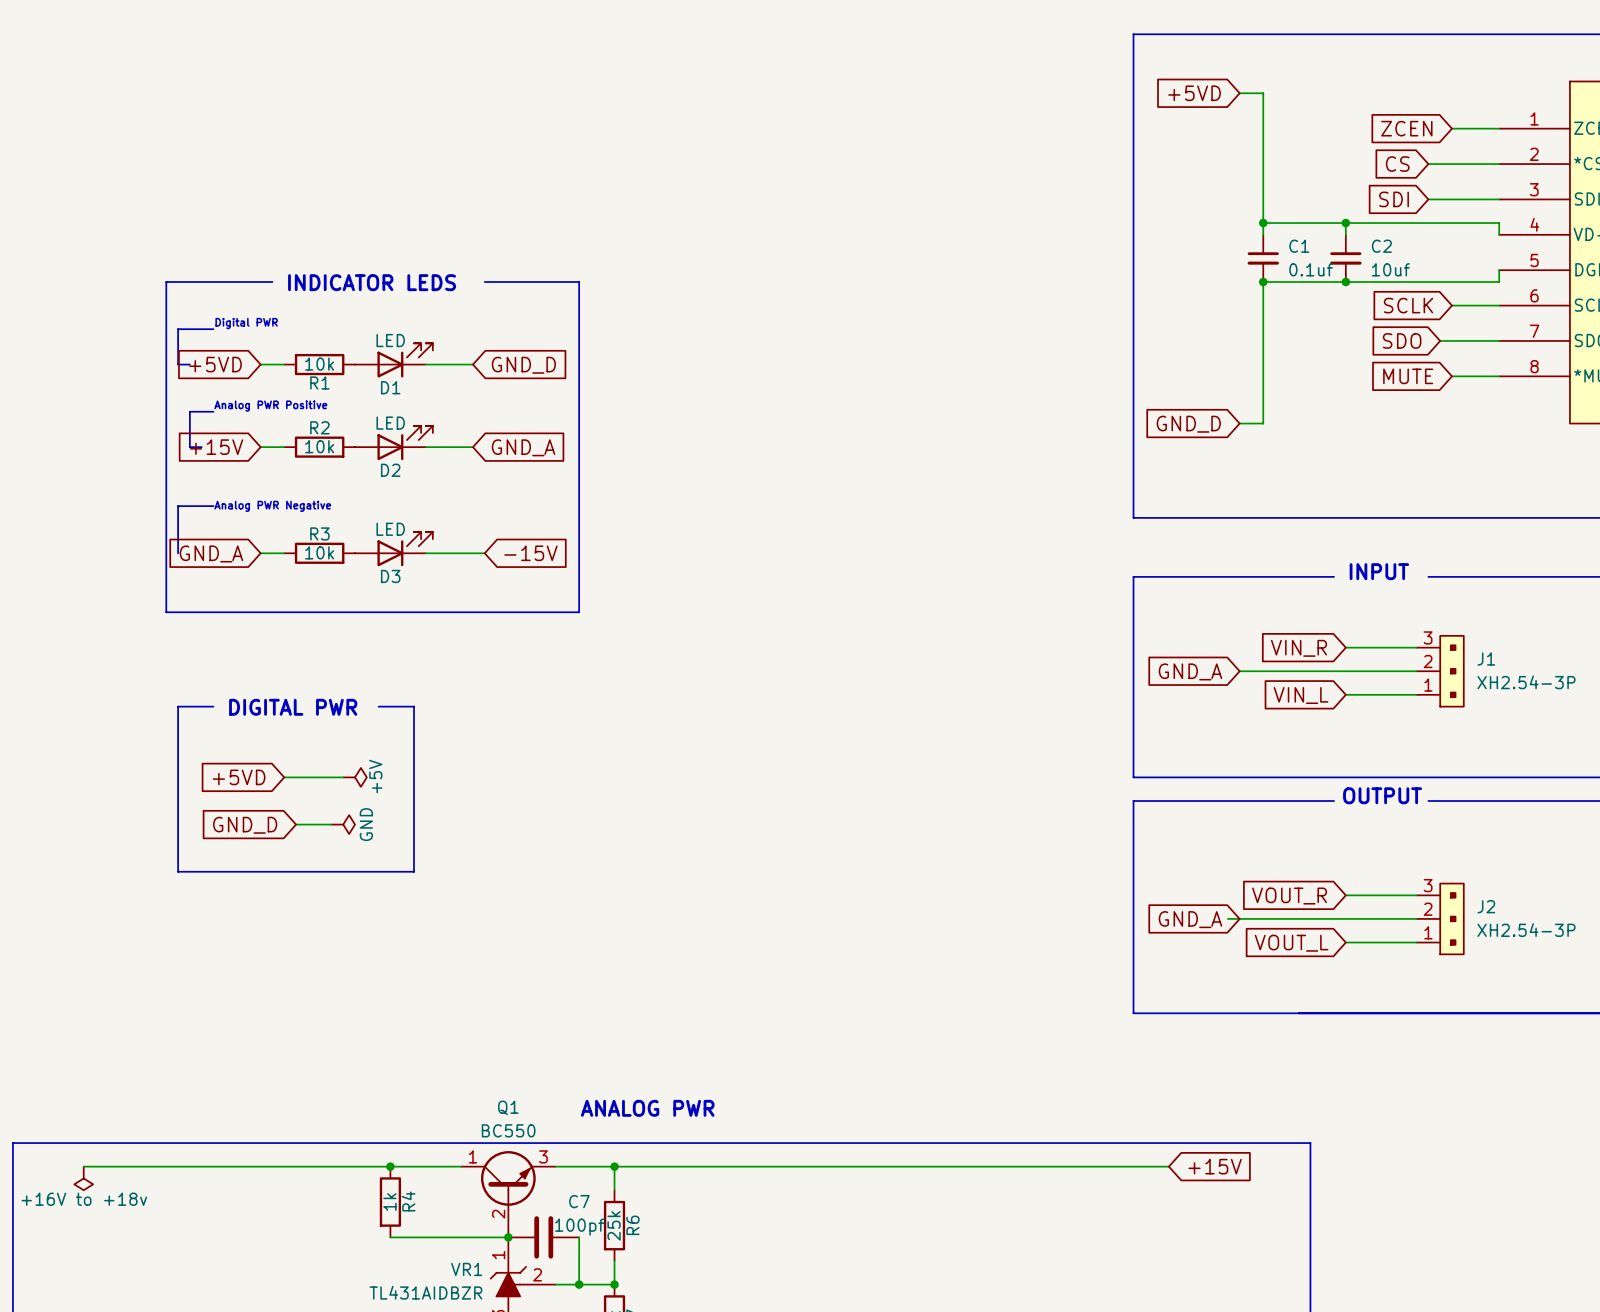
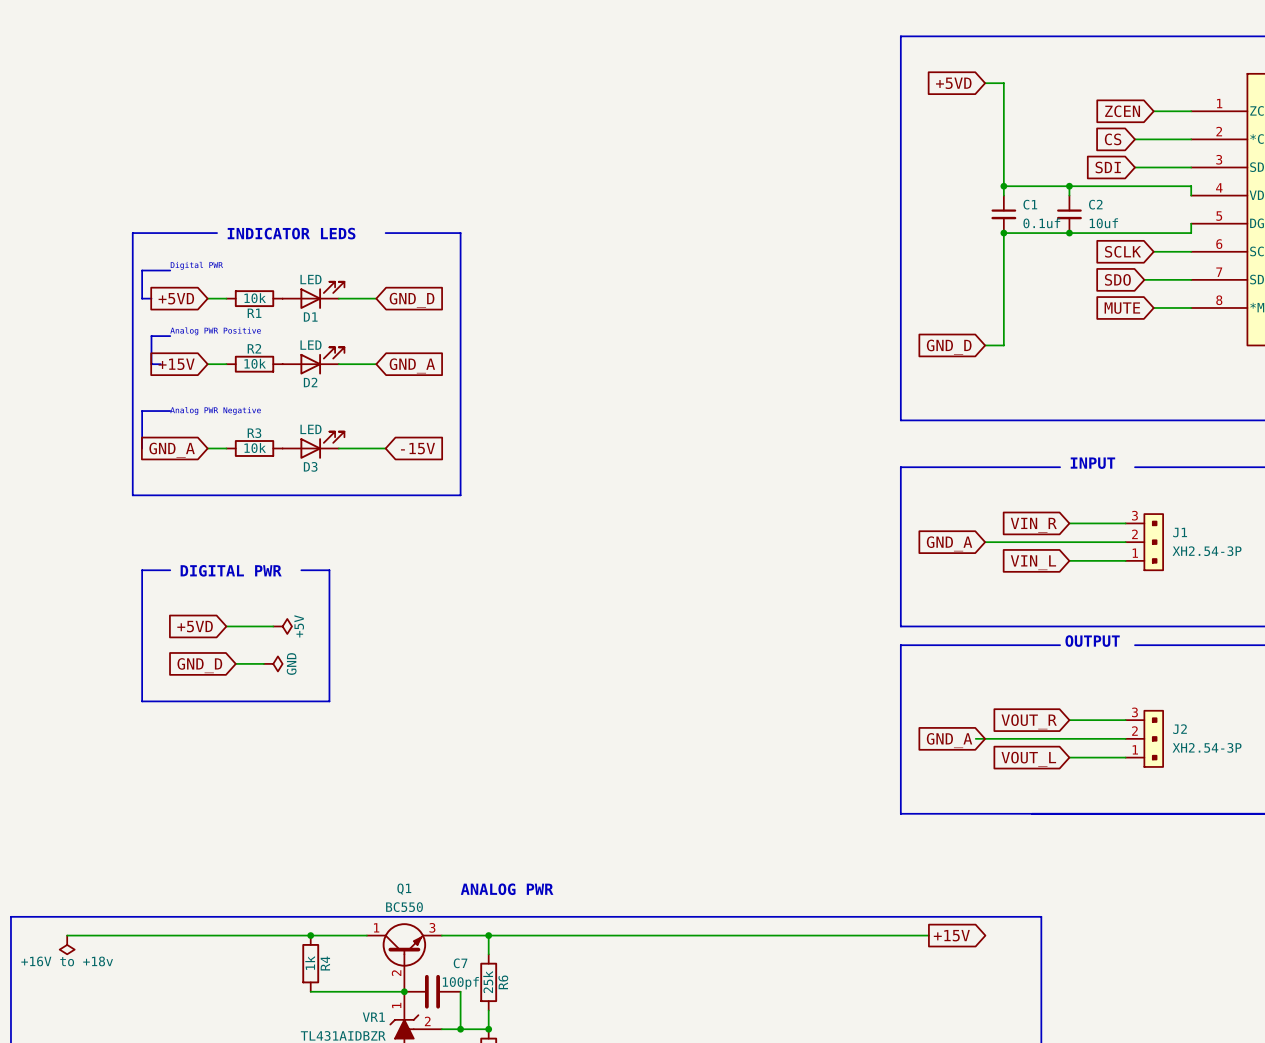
global label shape: input (1215, 1166) -> output (951, 935)

